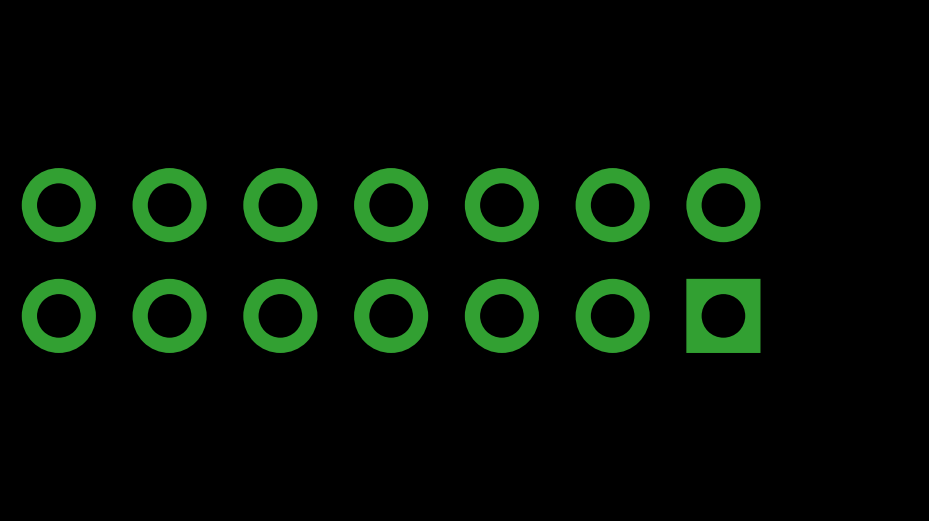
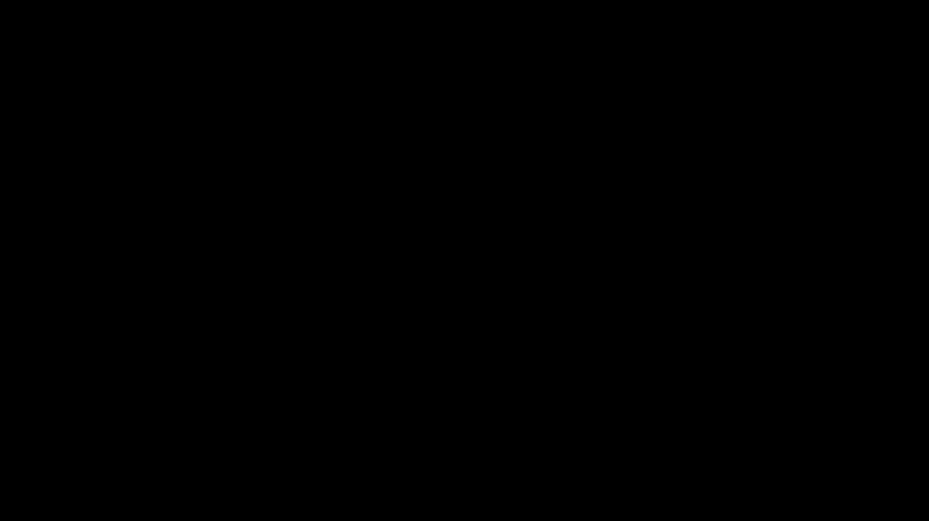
part: (391, 260) -> none

